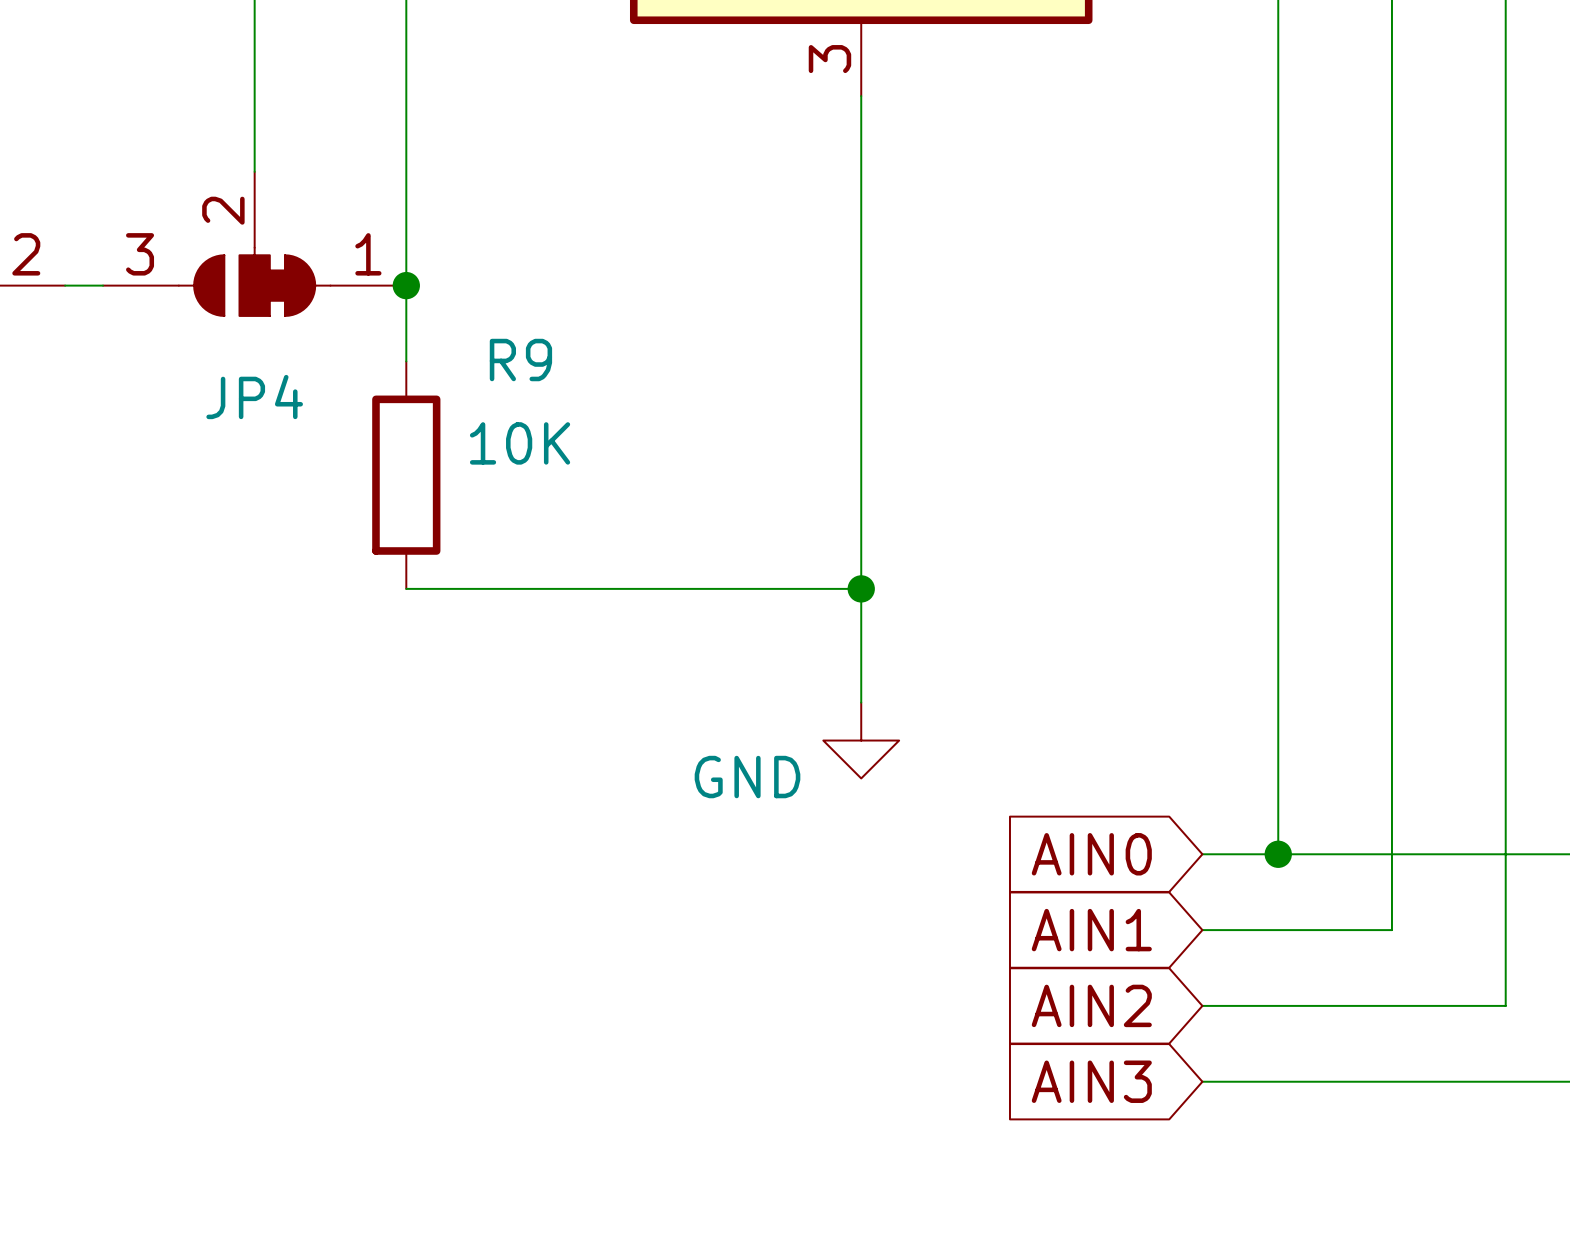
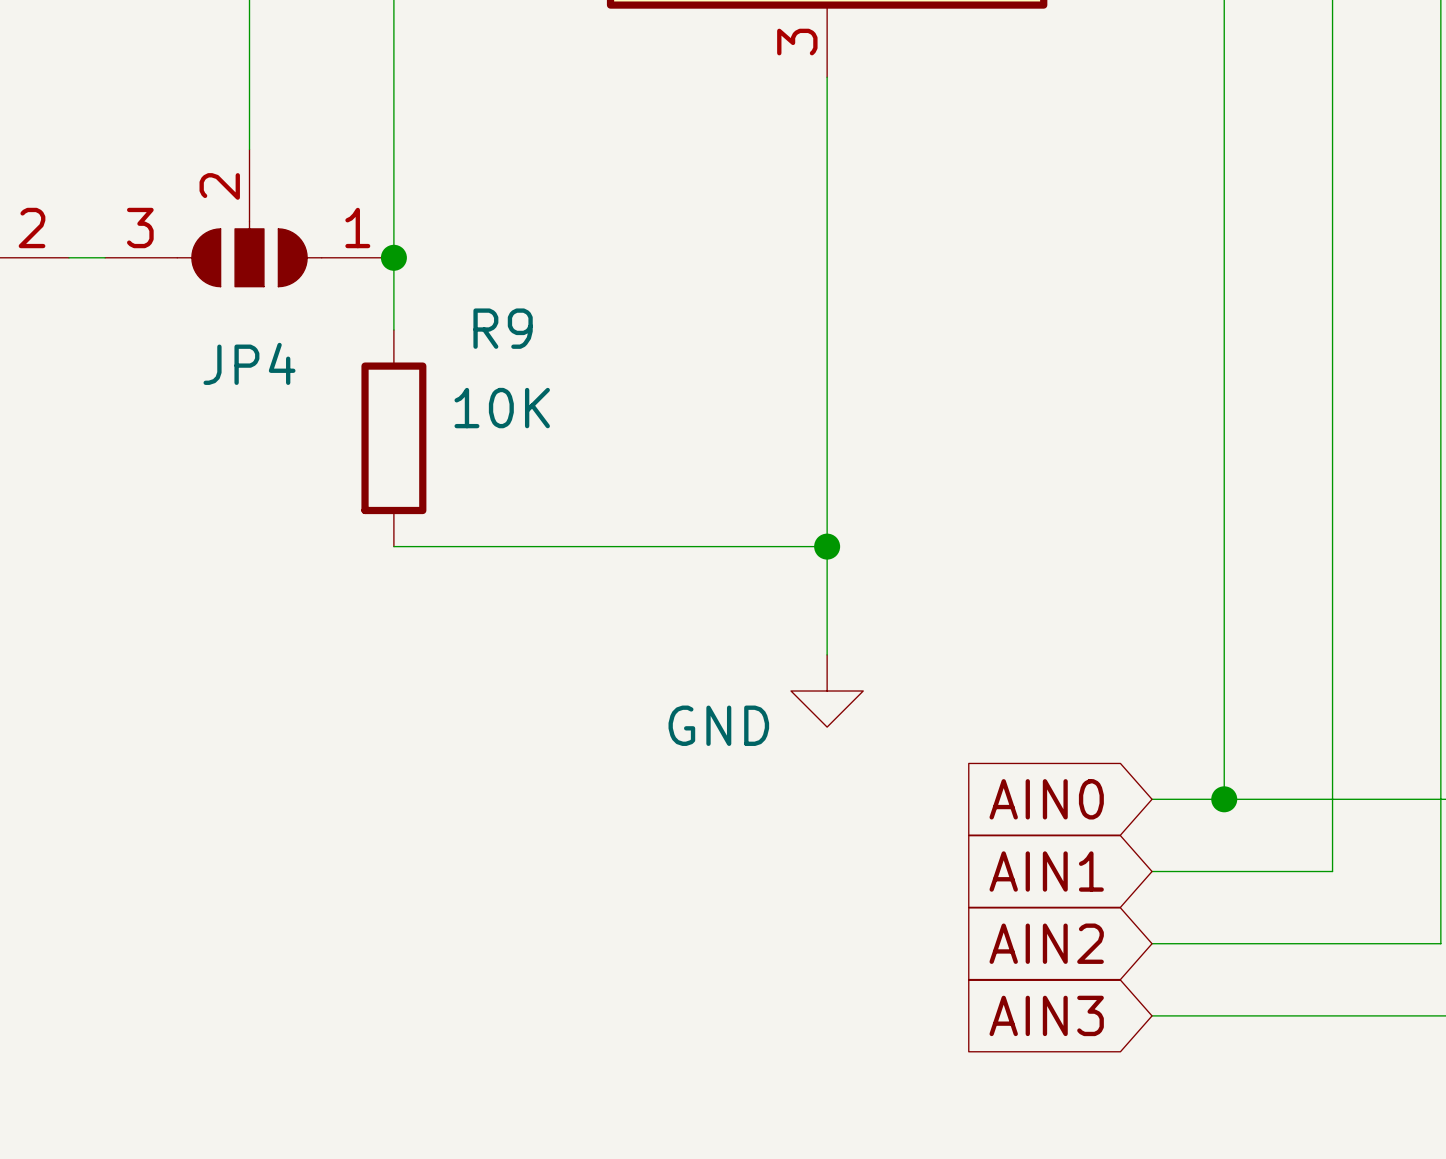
JP4 symbol: [103, 171, 407, 316] -> [105, 149, 394, 287]

